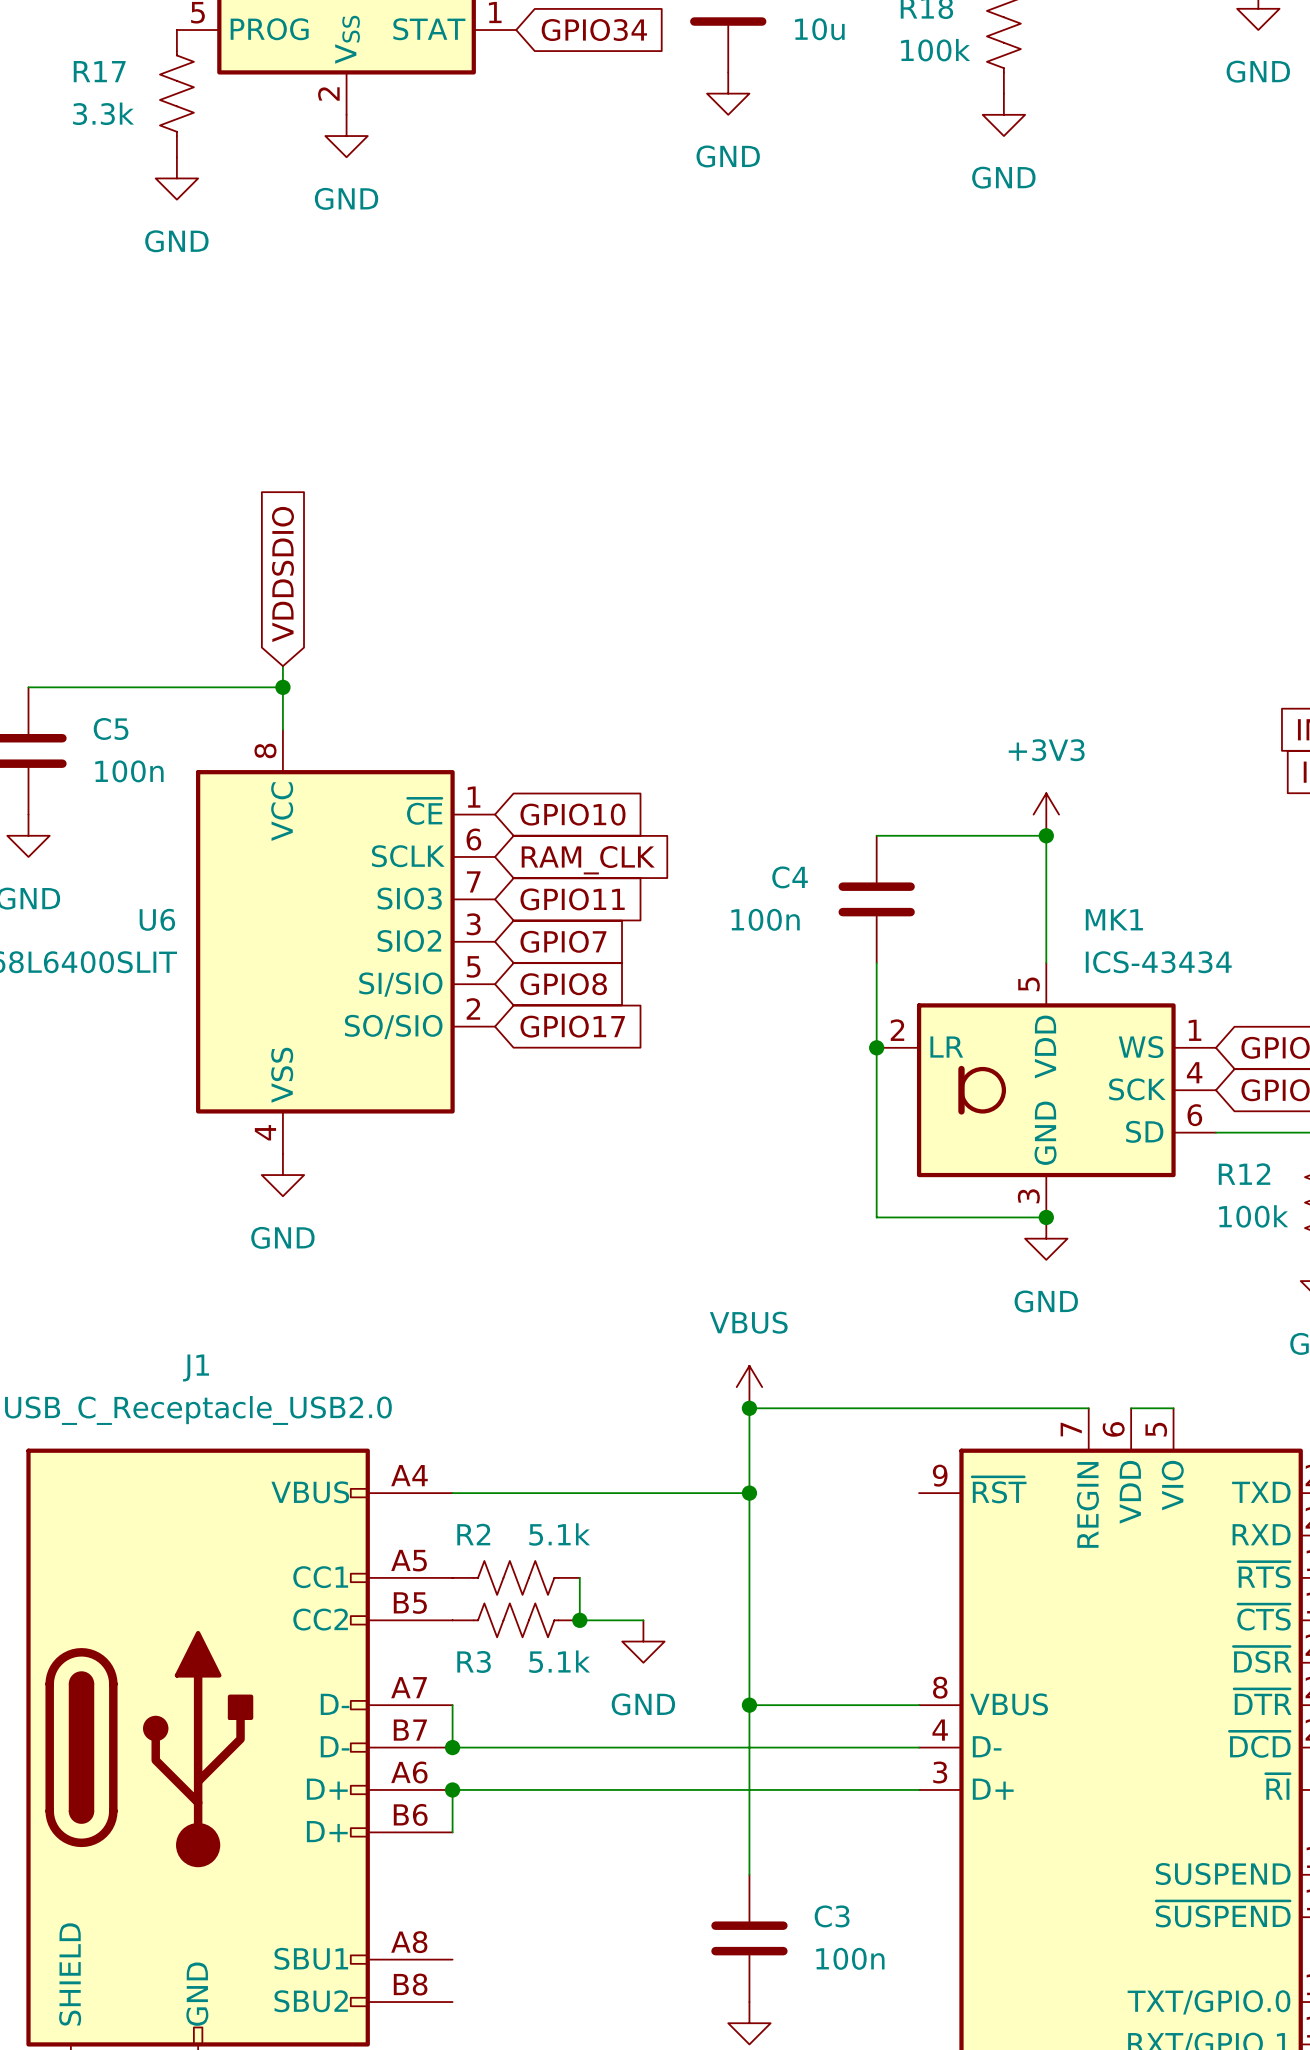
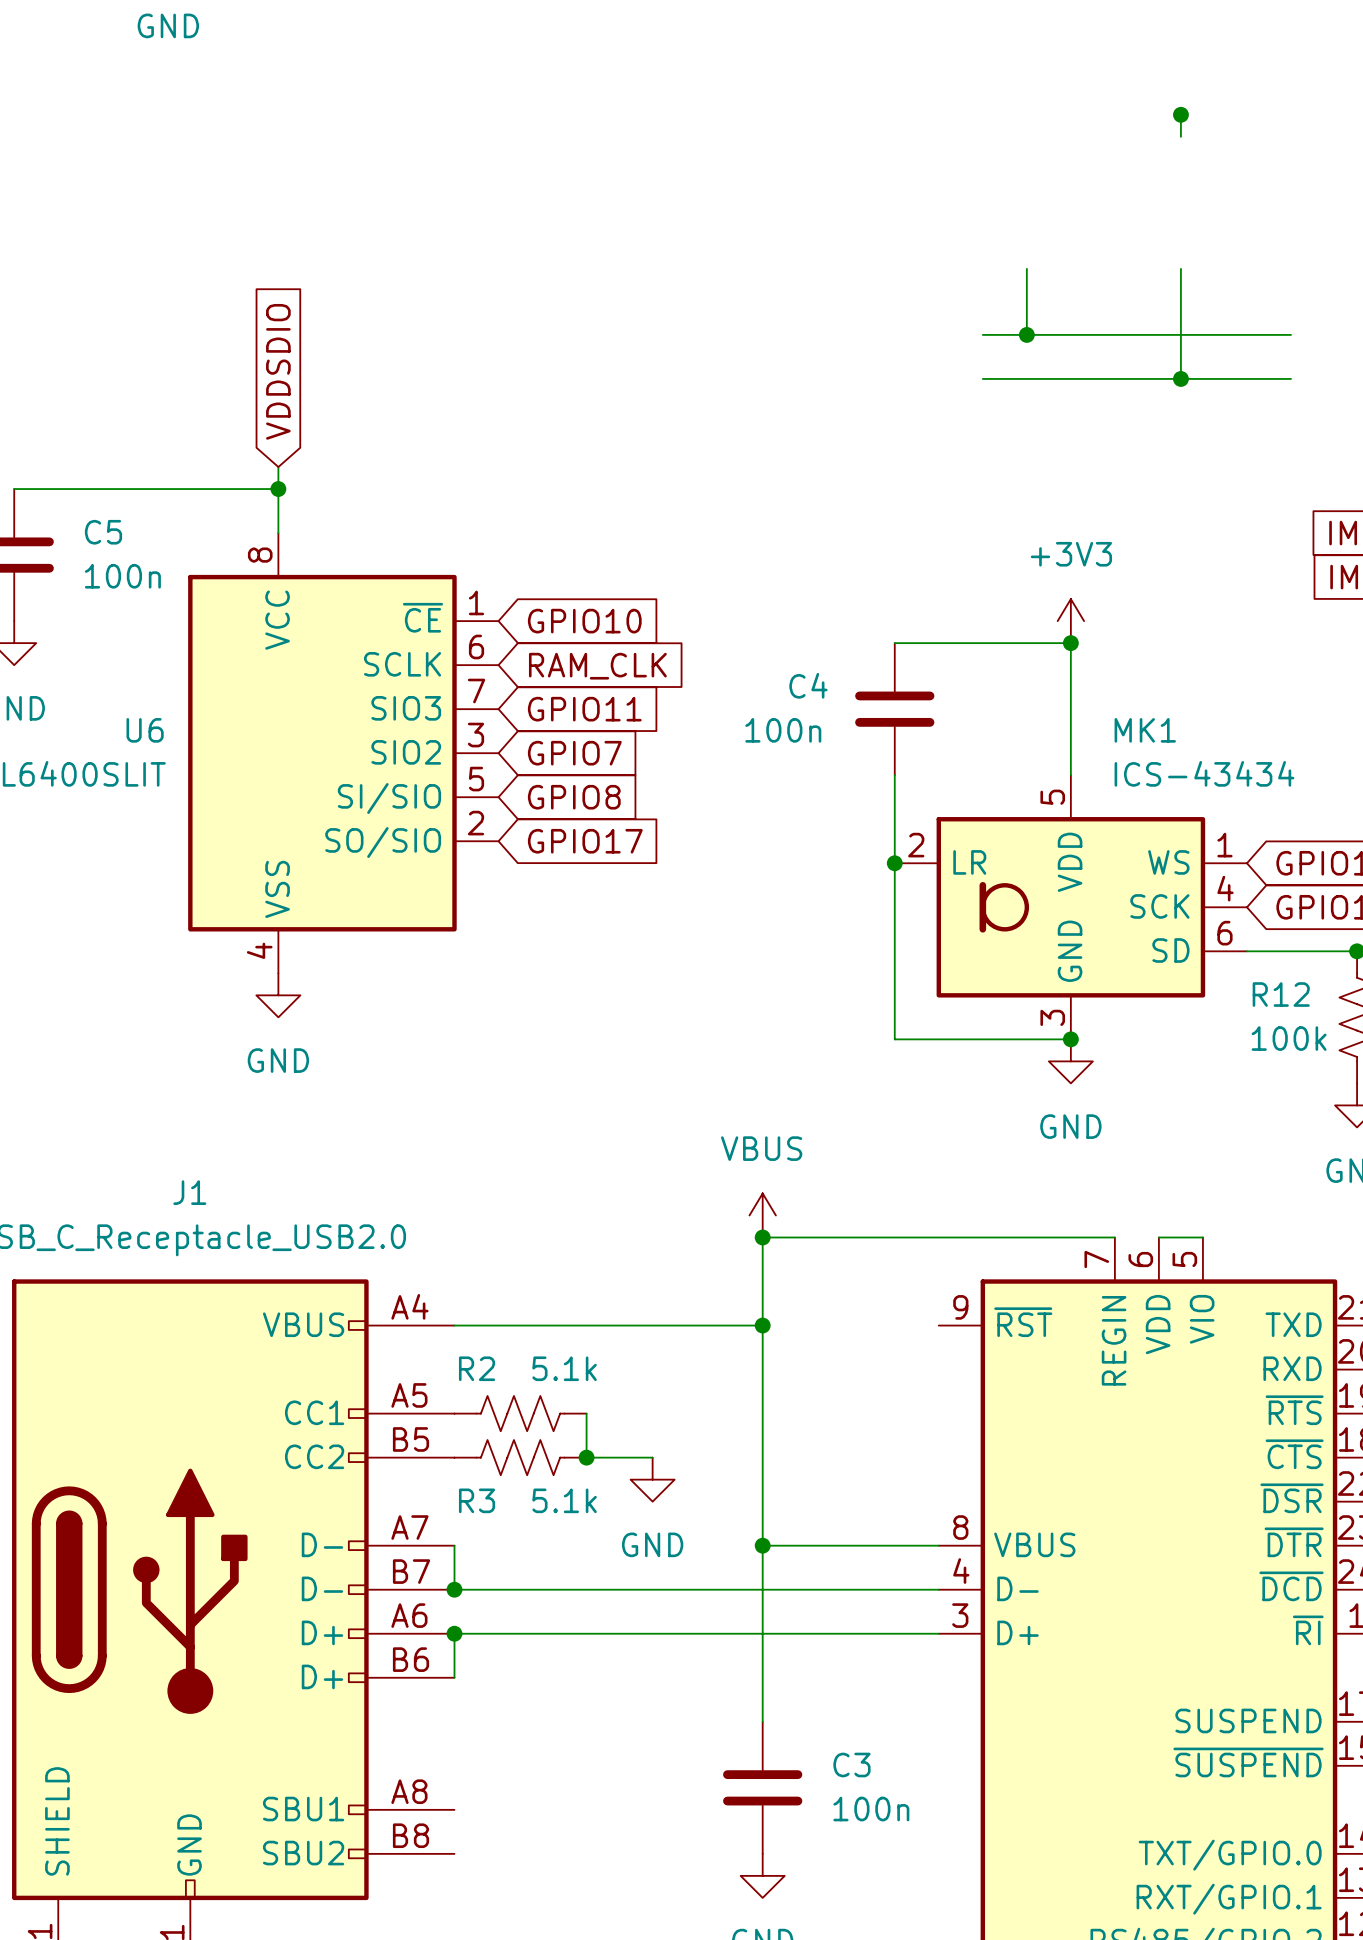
wire: none -> (1180, 114) (1180, 136)
junction: none -> (1180, 114)
wire: none -> (1026, 268) (1026, 334)
wire: none -> (1180, 268) (1180, 378)
wire: none -> (982, 334) (1291, 334)
junction: none -> (1026, 334)
wire: none -> (982, 378) (1291, 378)
junction: none -> (1180, 378)

